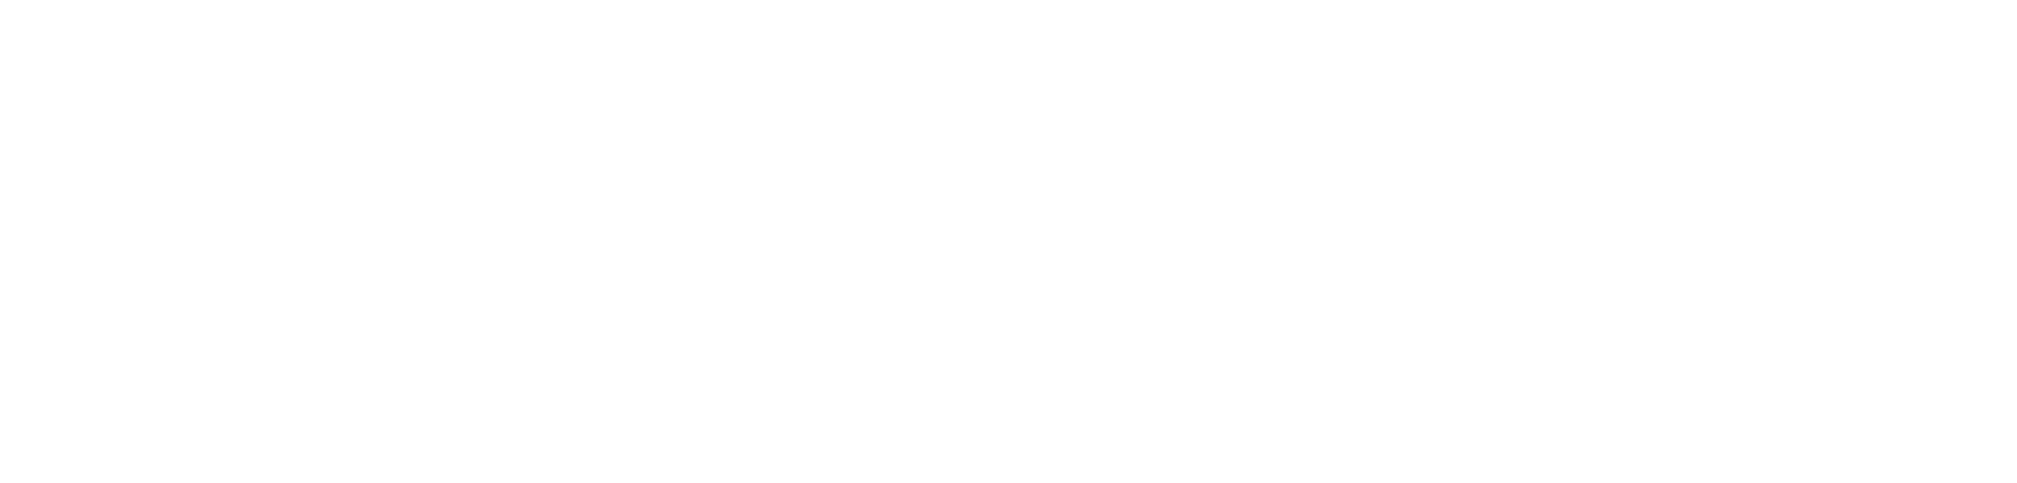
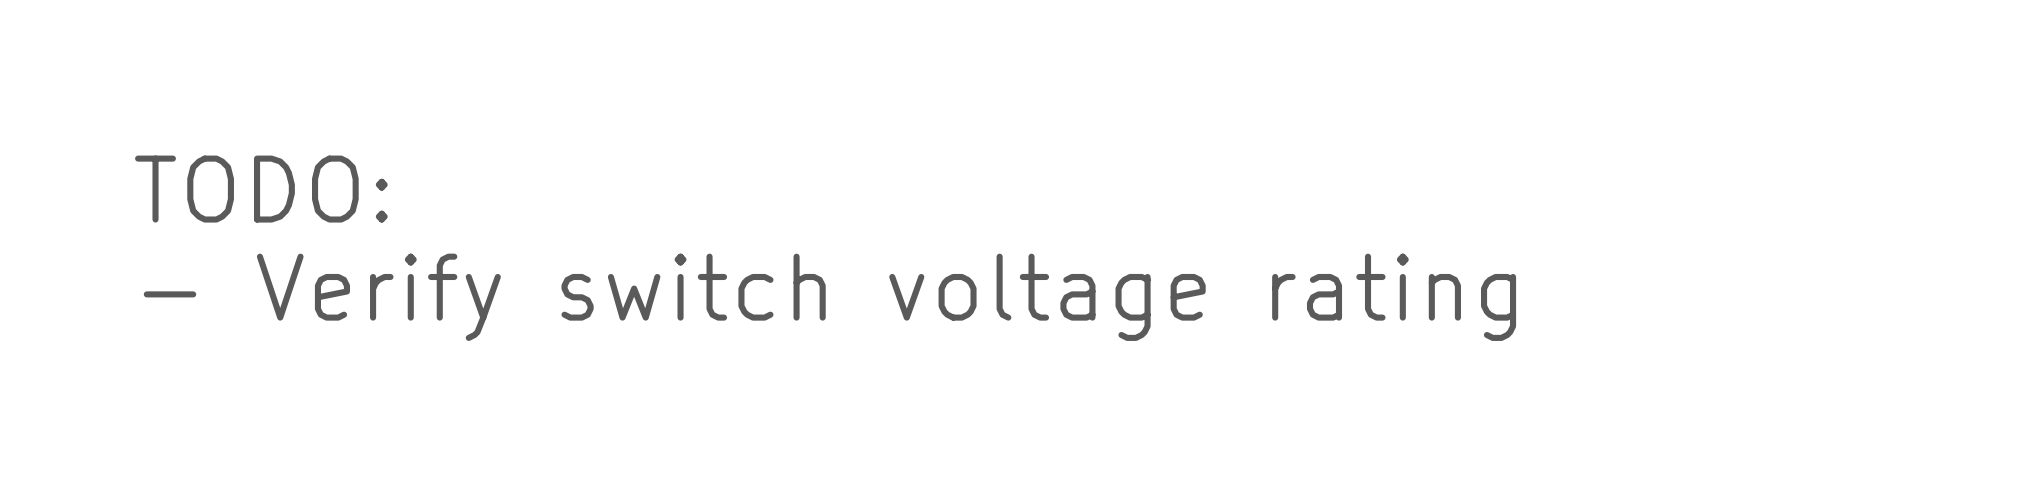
text: none -> TODO: (261, 189)
text: none -> - Verify switch voltage rating (829, 297)

